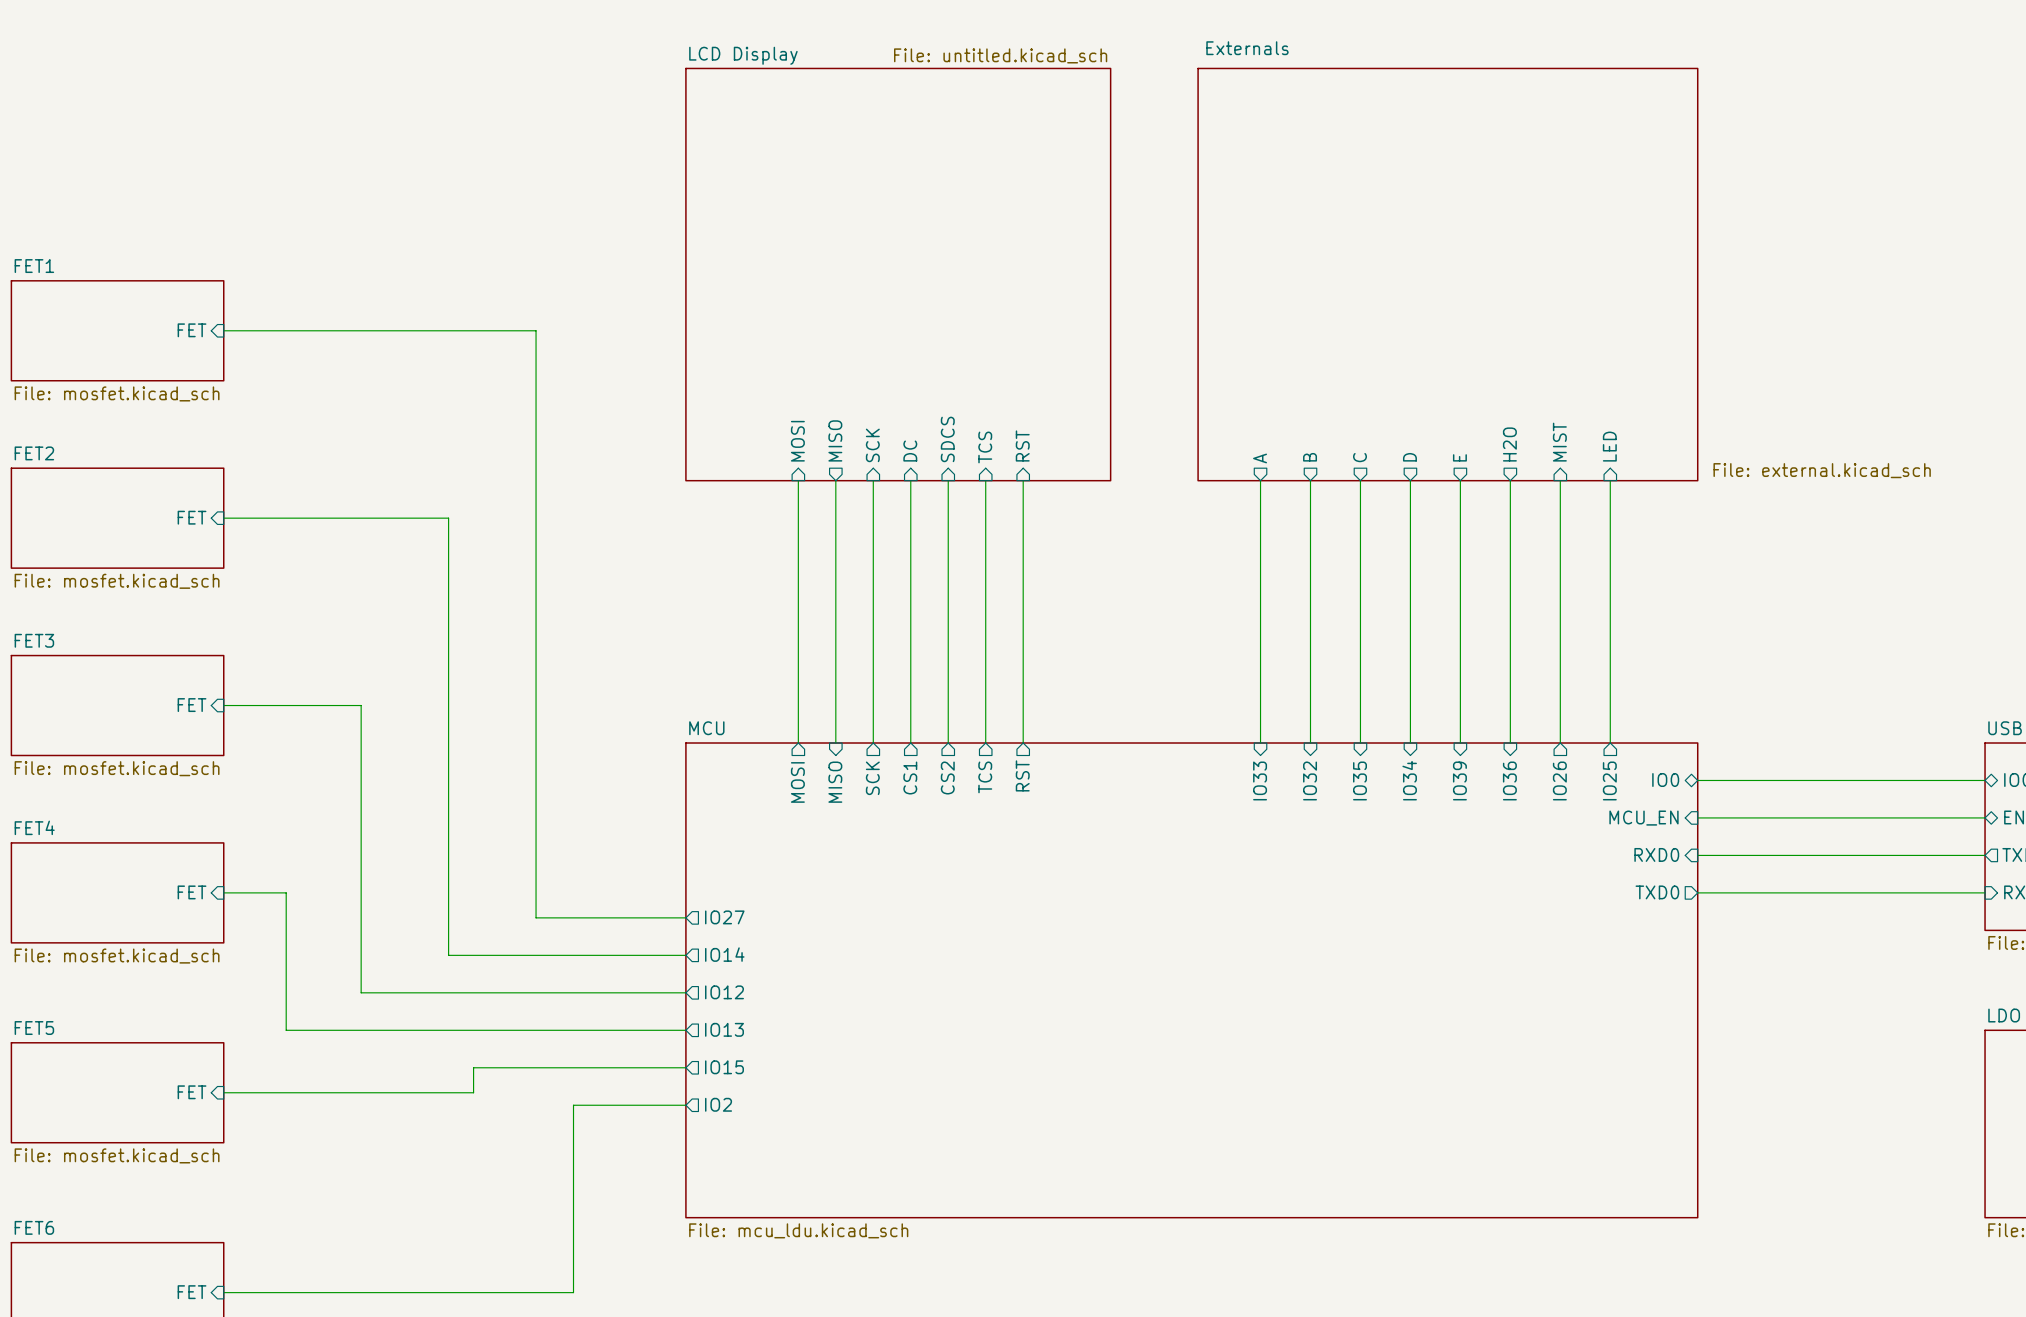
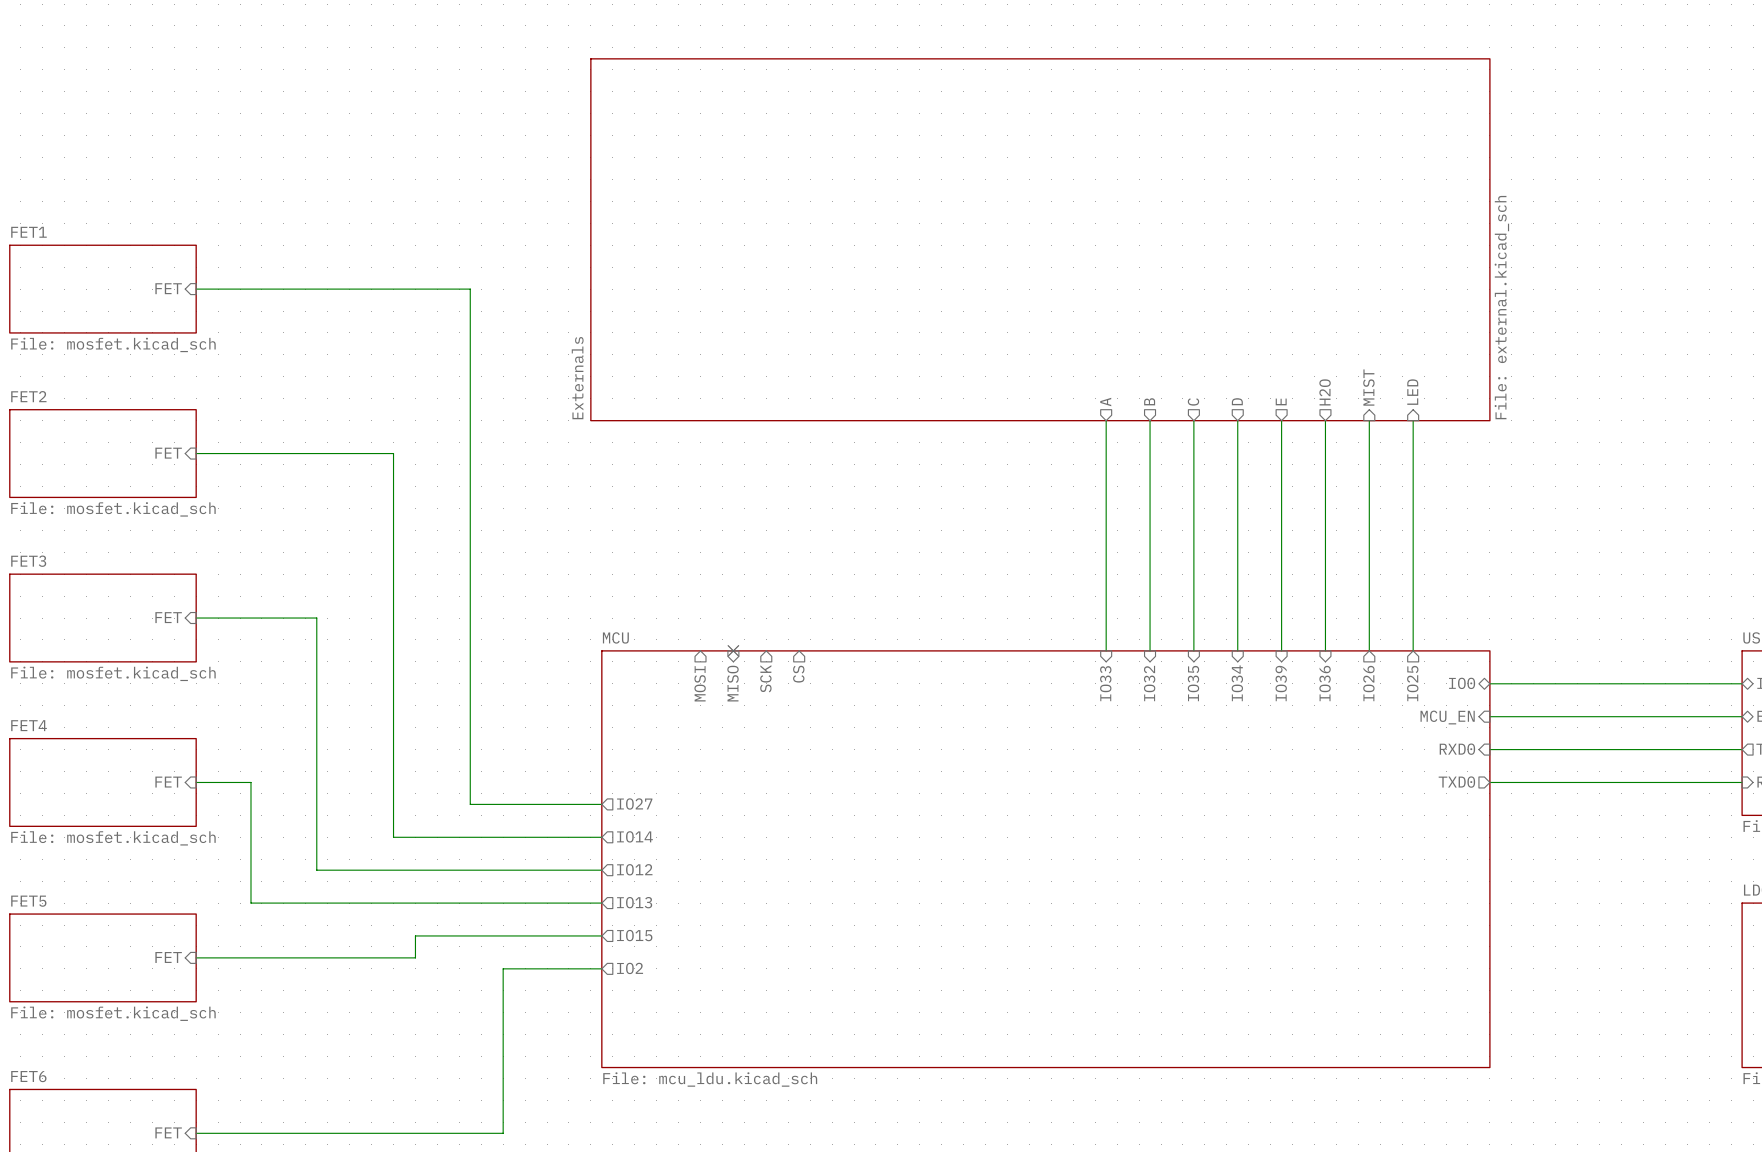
sheet LCD Display: File: untitled.kicad_sch (898, 274) -> none
sheet Externals: none -> File: external.kicad_sch (1040, 239)
sheet Externals: File: external.kicad_sch (1447, 274) -> none
sheet pin: SDCS (947, 439) -> none
sheet pin: MISO (835, 440) -> none
sheet pin: MOSI (797, 441) -> none
sheet pin: SCK (872, 445) -> none
sheet pin: RST (1022, 445) -> none
sheet pin: TCS (985, 447) -> none
sheet pin: DC (910, 451) -> none
wire: (798, 480) (798, 743) -> none
wire: (835, 480) (835, 743) -> none
wire: (873, 480) (873, 743) -> none
wire: (910, 480) (910, 743) -> none
wire: (948, 480) (948, 743) -> none
wire: (985, 480) (985, 743) -> none
wire: (1023, 480) (1023, 743) -> none
no-connect mark: none -> (733, 650)
sheet pin: RST (1022, 775) -> none
sheet pin: CS1 (910, 777) -> CS (798, 674)
sheet pin: CS2 (947, 777) -> none
sheet pin: TCS (985, 777) -> none

